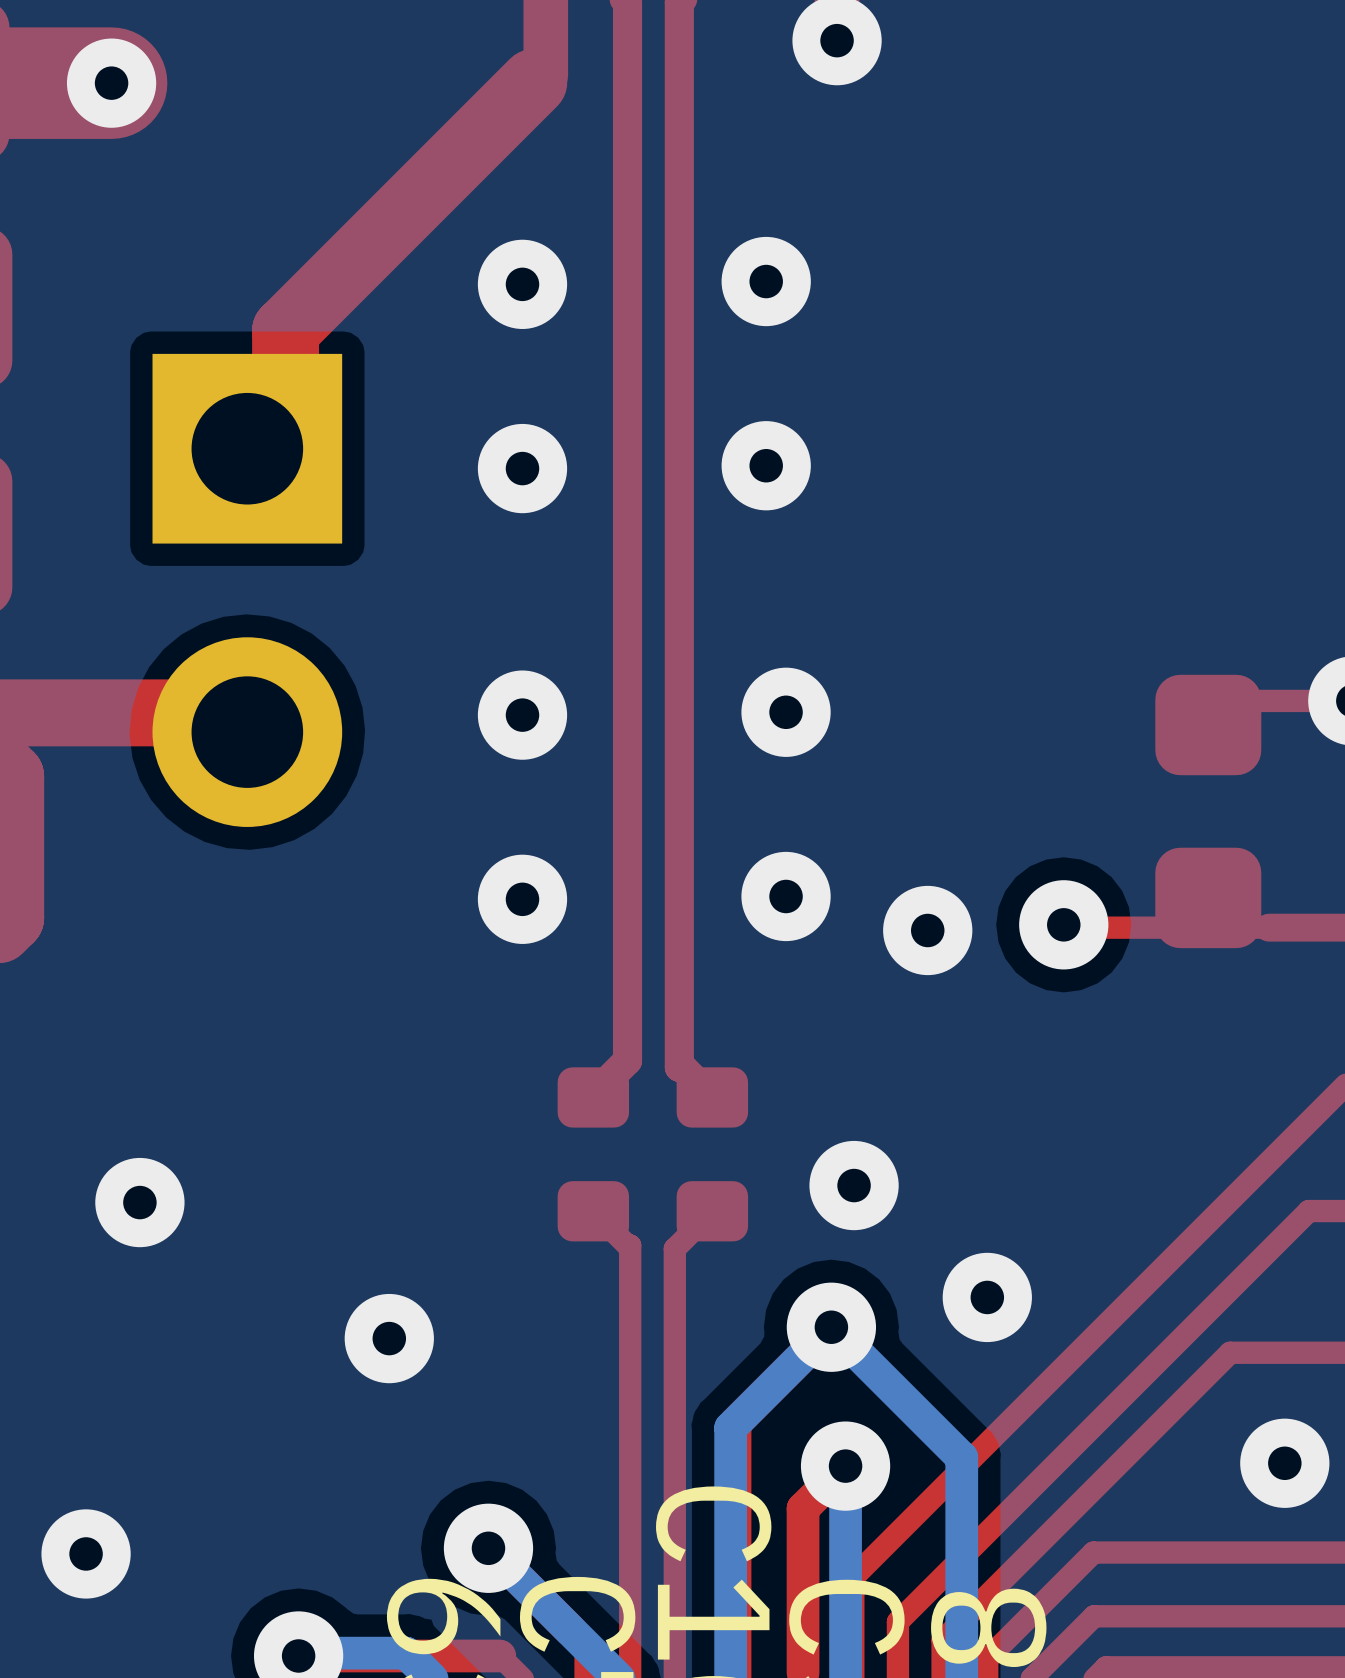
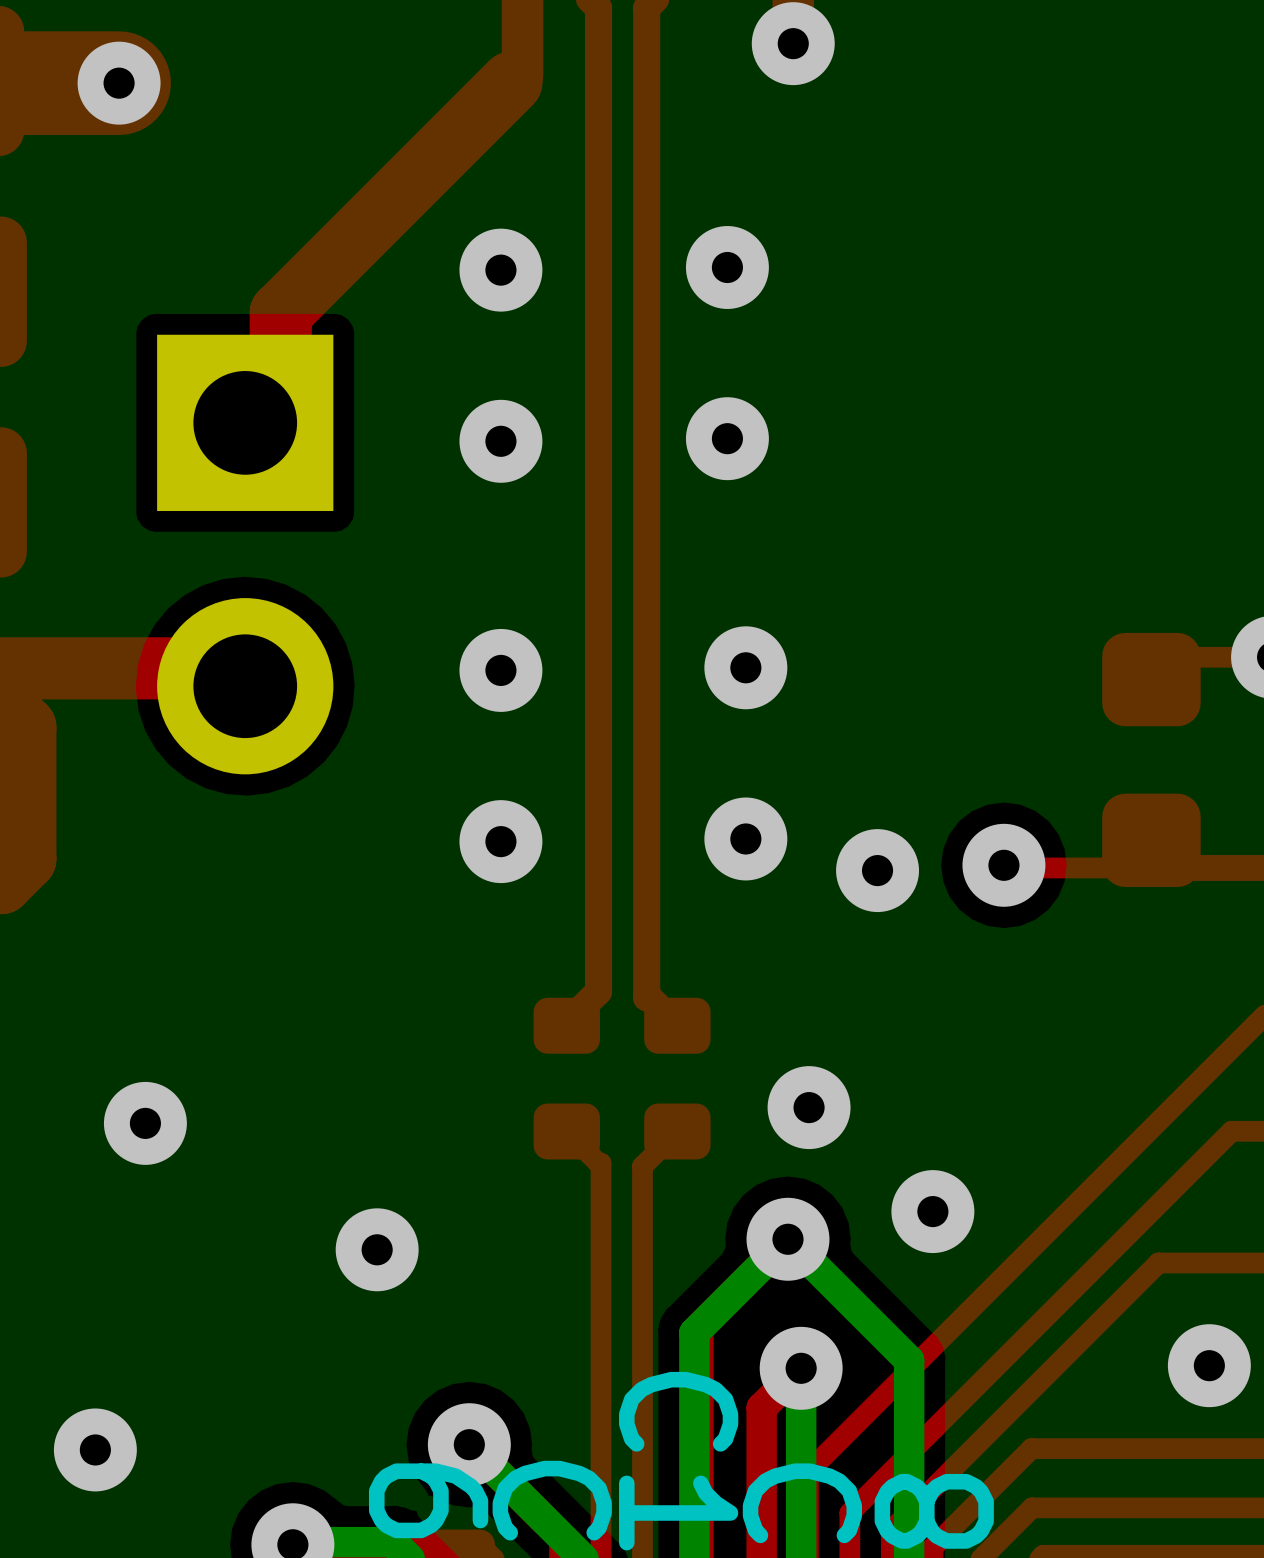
part position: (1208, 811) -> (1151, 759)

